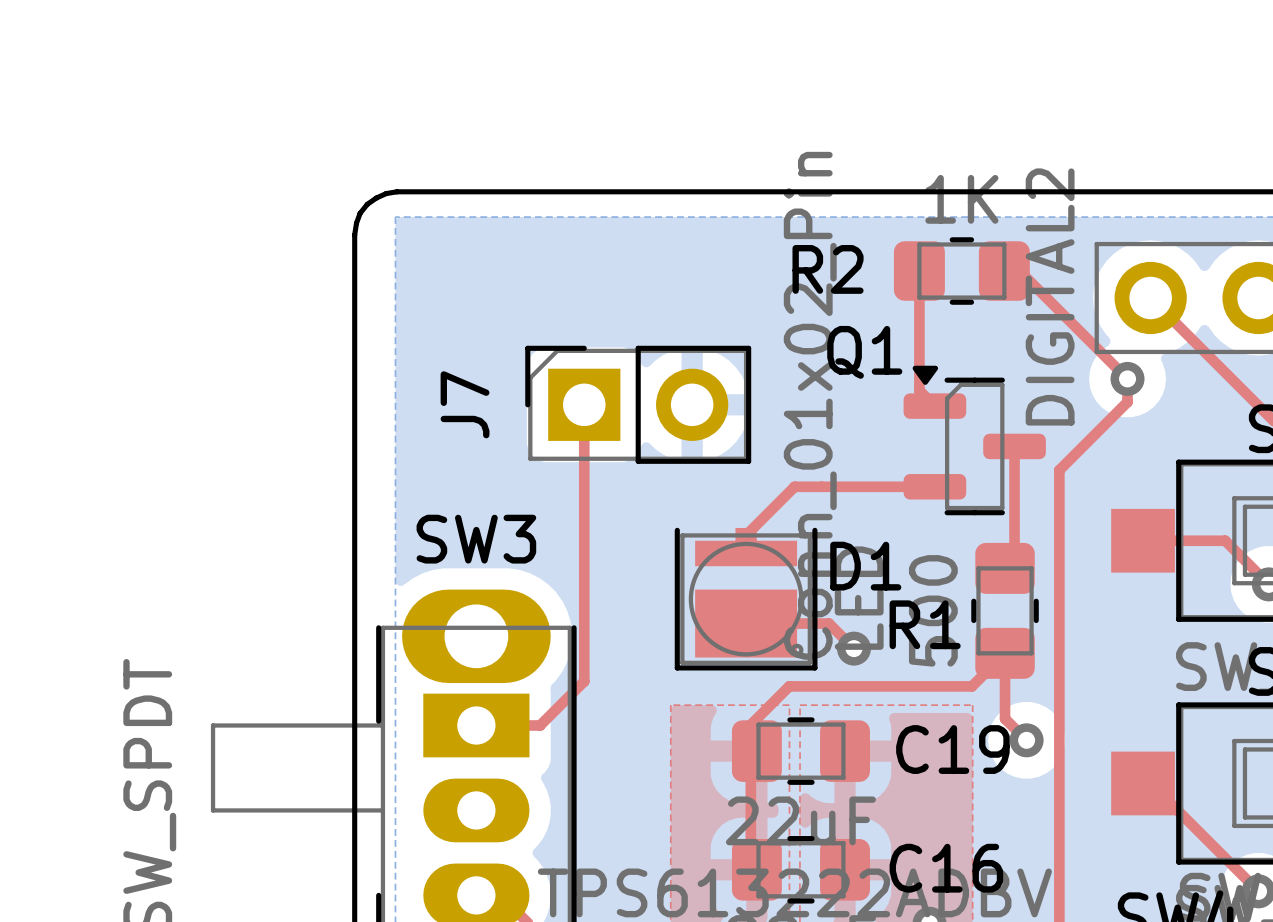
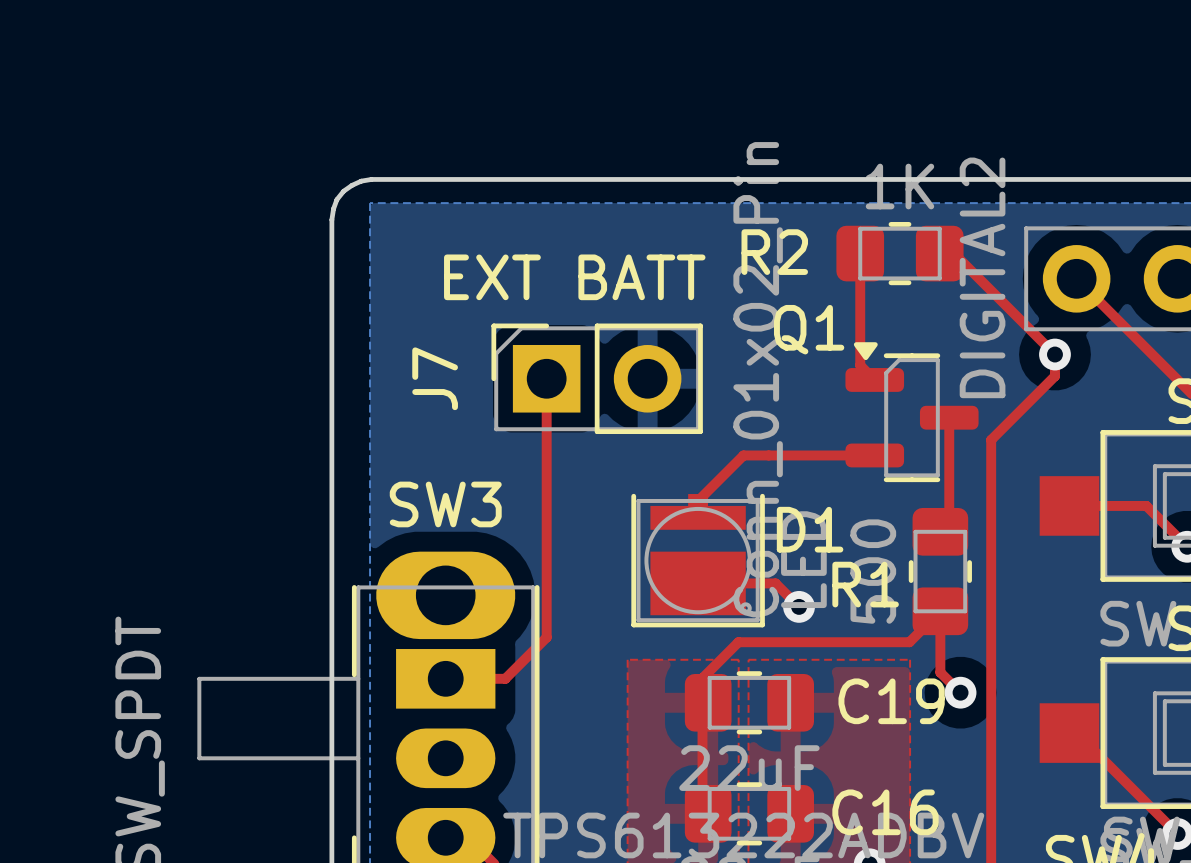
text: none -> EXT BATT (574, 277)

